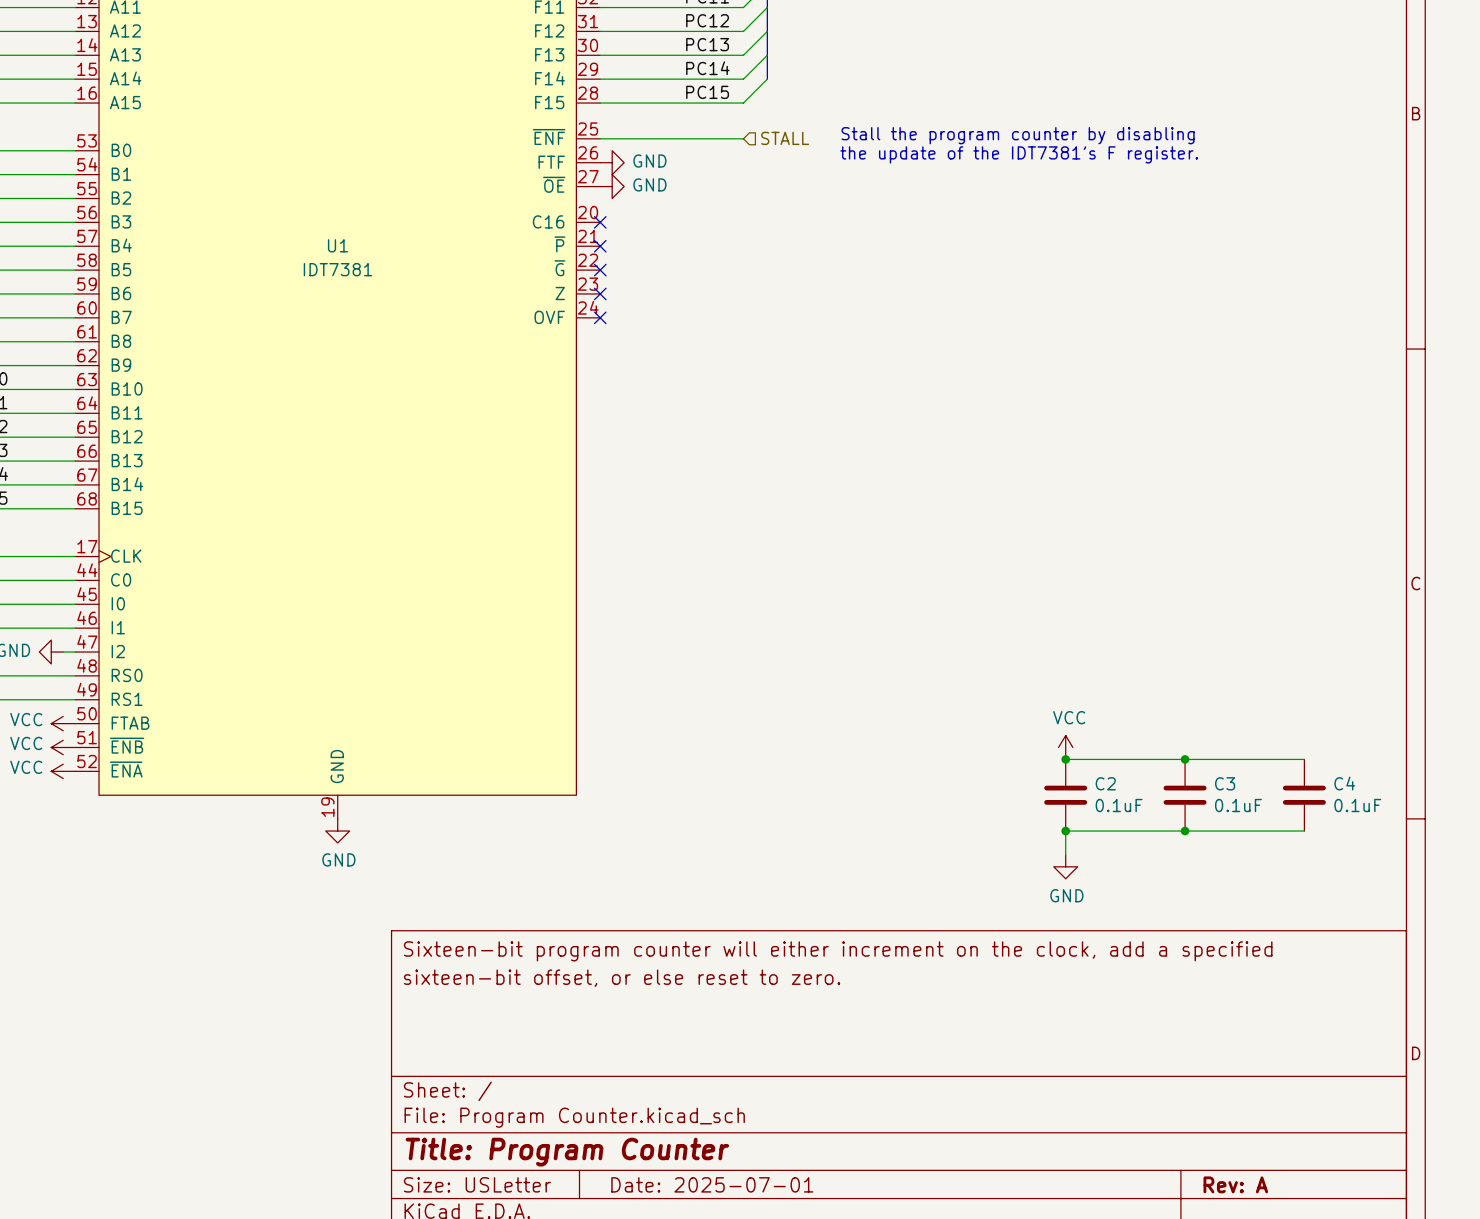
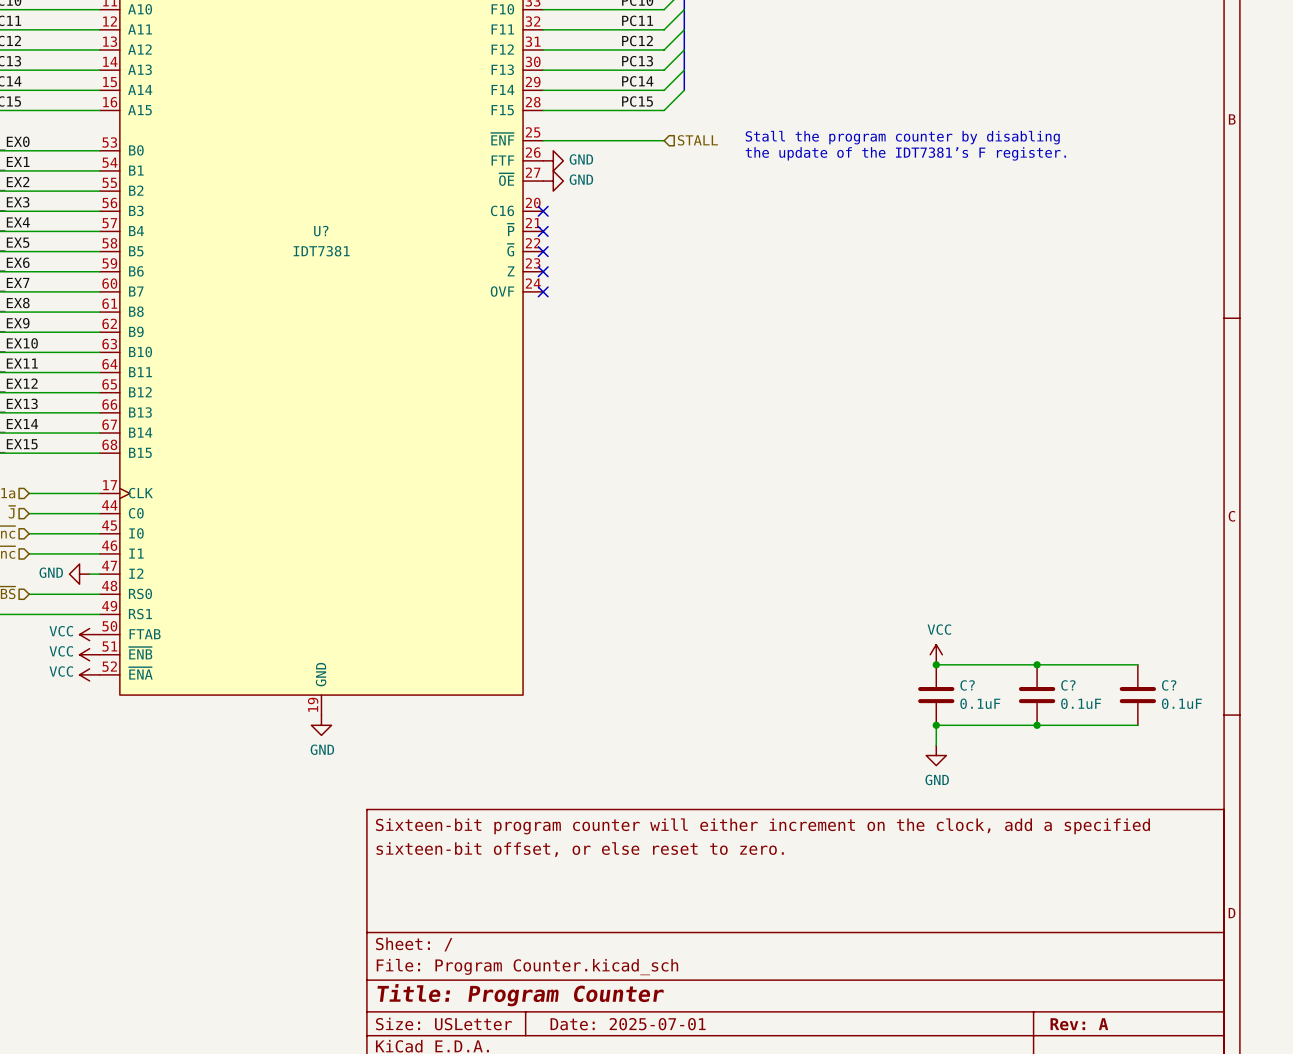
U1 name: U1 (337, 245) -> U? (321, 231)
C2 name: C2 (1105, 783) -> C? (967, 685)
C3 name: C3 (1225, 783) -> C? (1068, 685)
C4 name: C4 (1344, 783) -> C? (1169, 685)

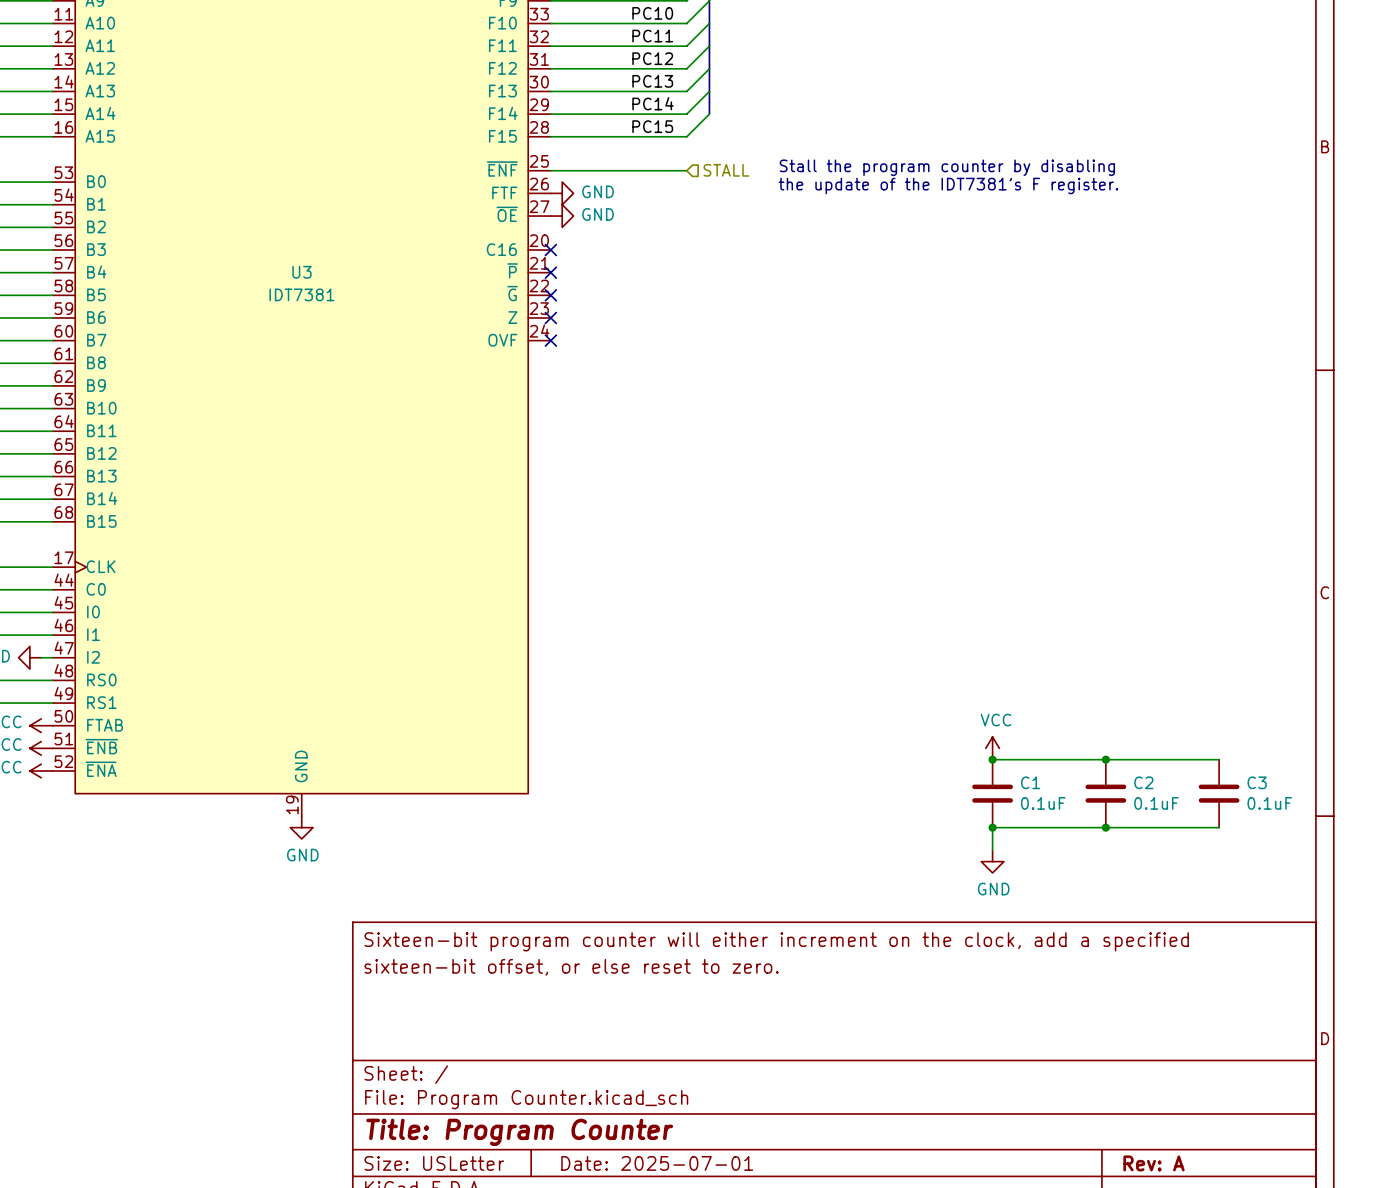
U? name: U? (321, 231) -> U3 (301, 272)
C? name: C? (967, 685) -> C1 (1030, 782)
C? name: C? (1068, 685) -> C2 (1143, 782)
C? name: C? (1169, 685) -> C3 (1257, 782)

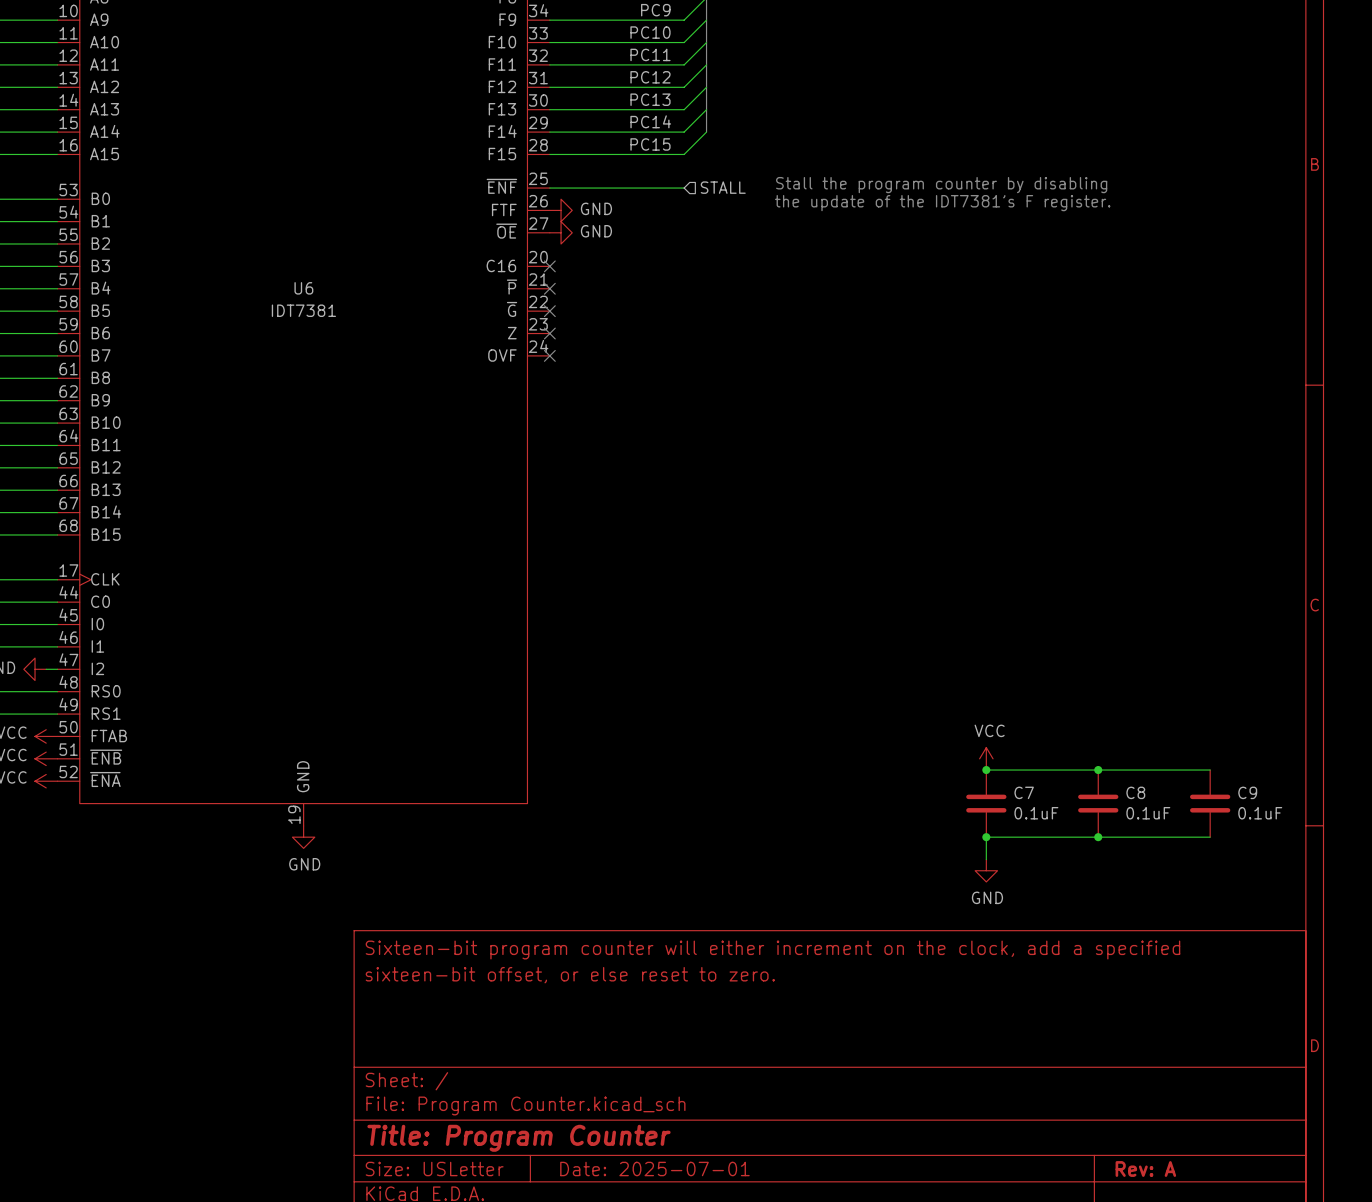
U3 name: U3 (301, 272) -> U6 (303, 288)
C1 name: C1 (1030, 782) -> C7 (1024, 792)
C2 name: C2 (1143, 782) -> C8 (1135, 792)
C3 name: C3 (1257, 782) -> C9 (1247, 792)

